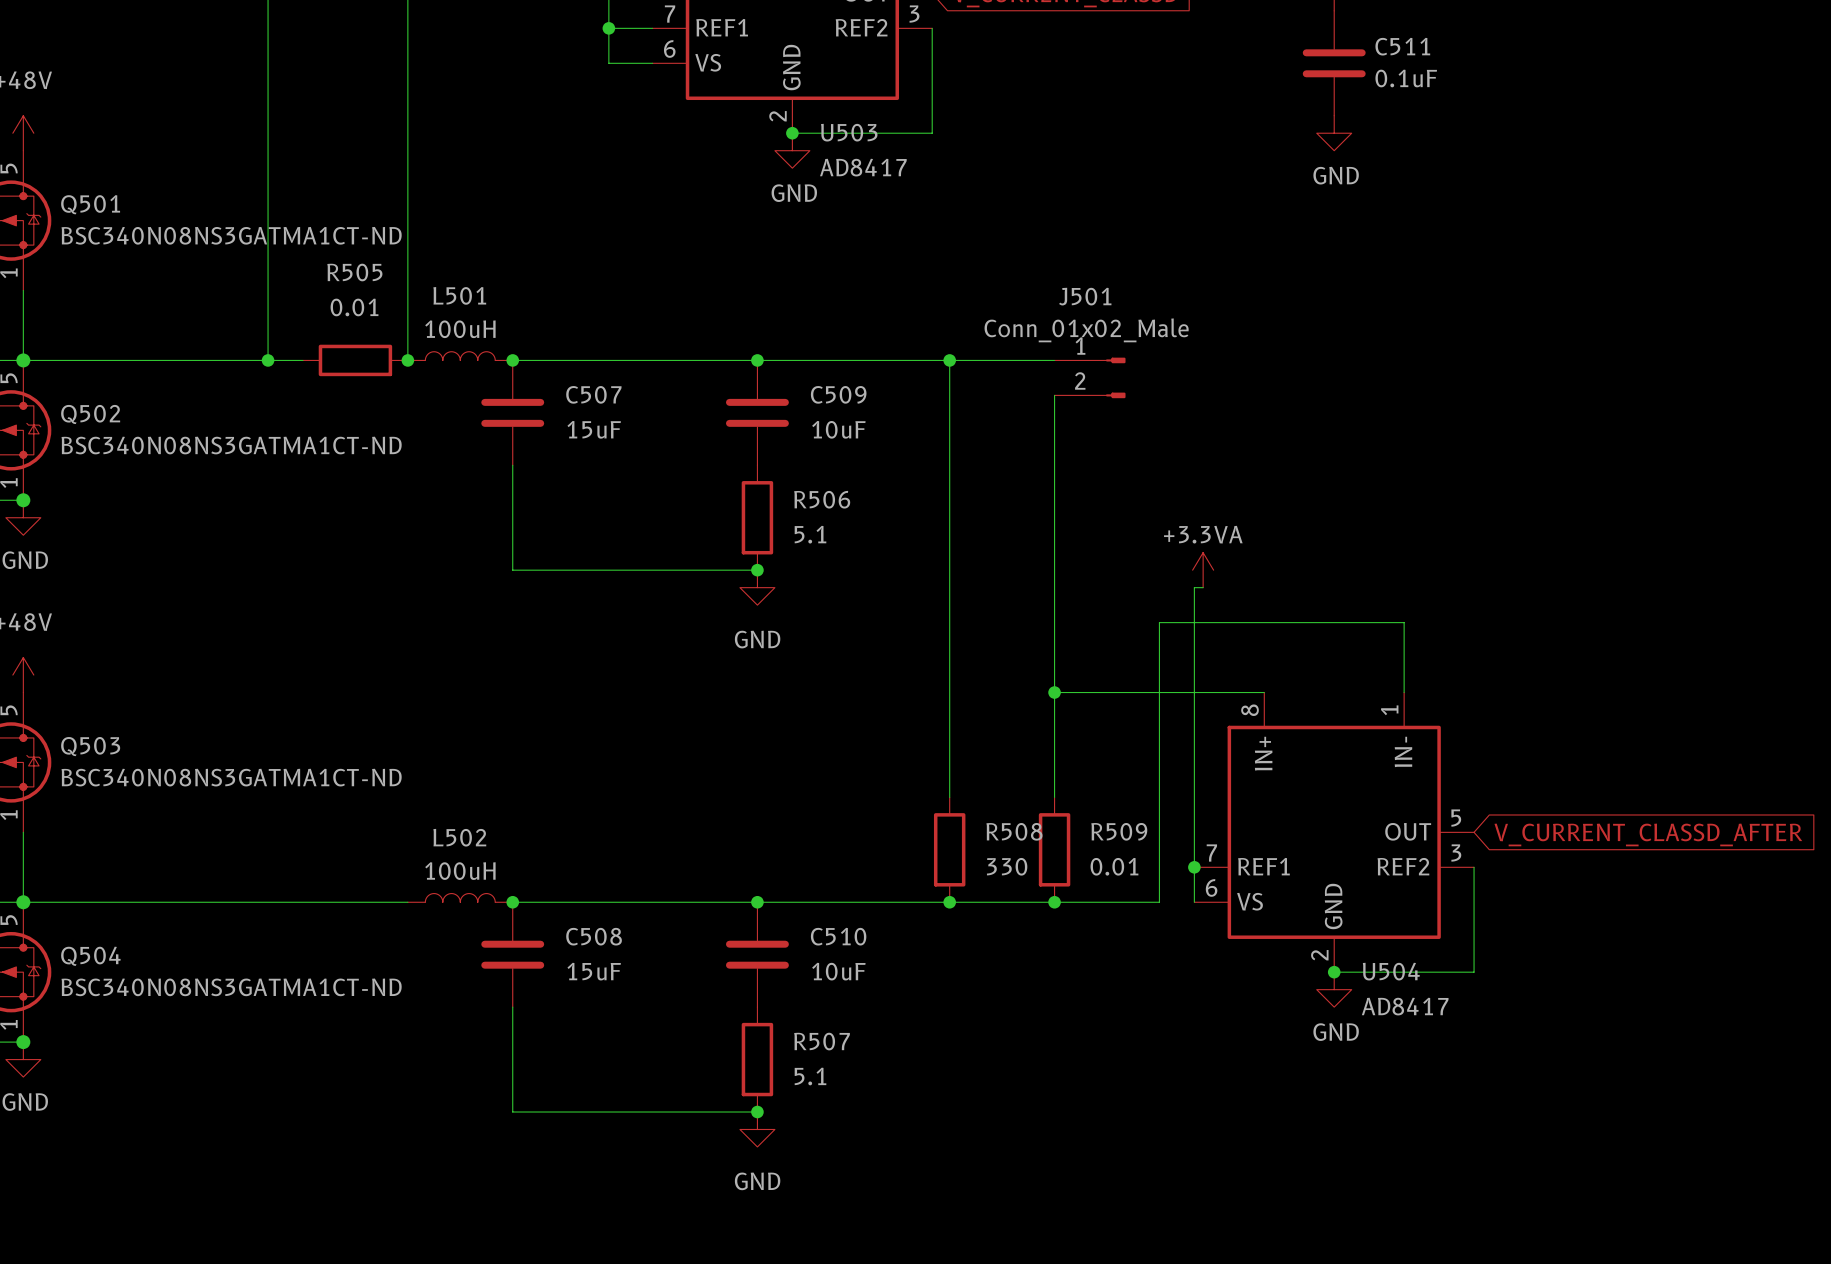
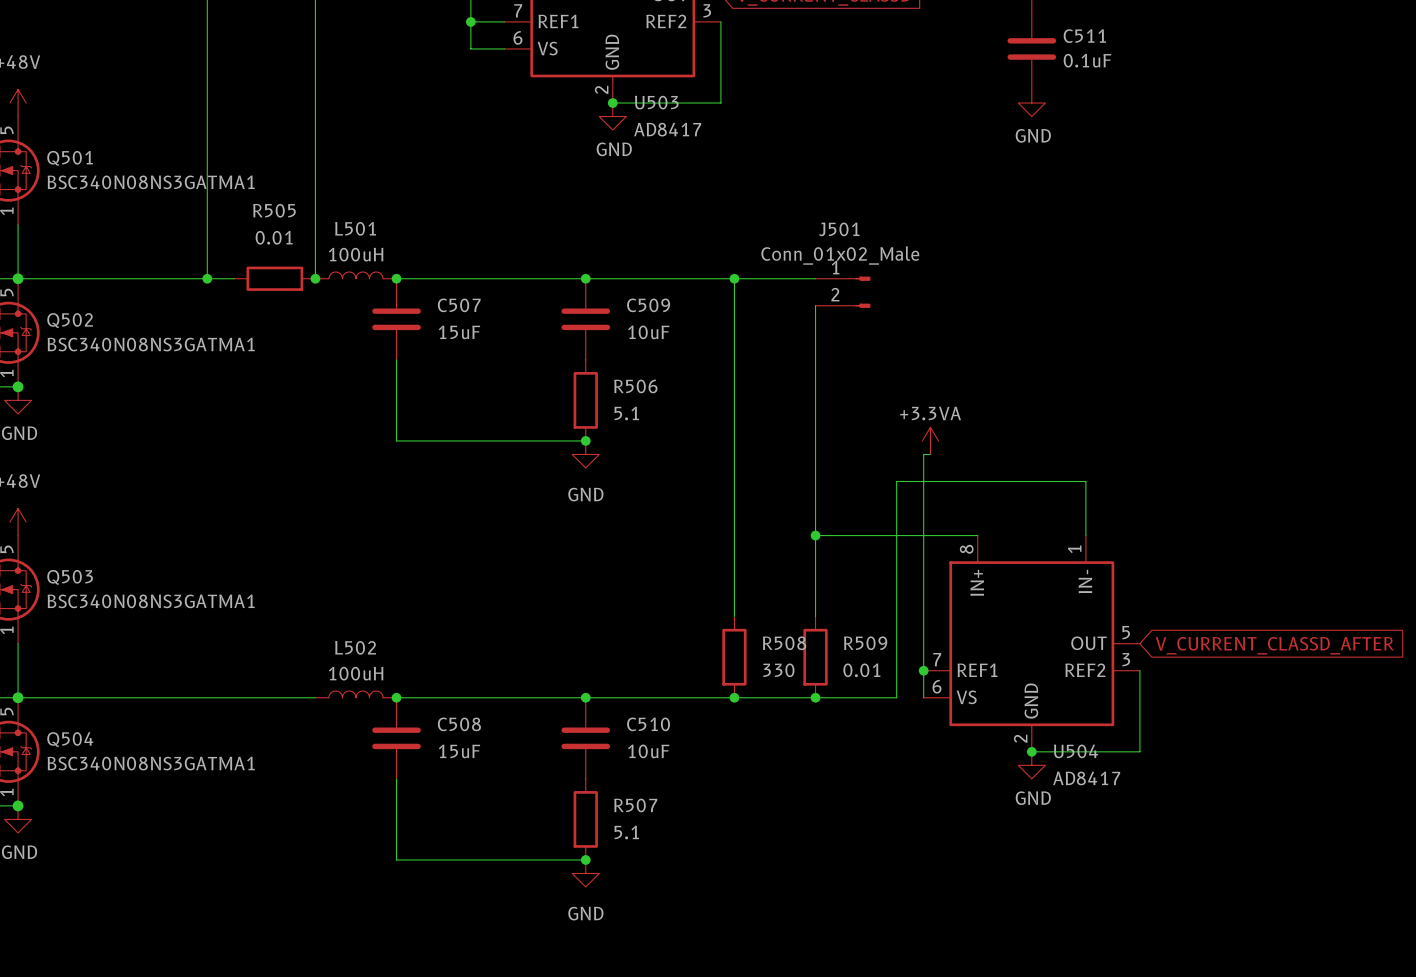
Q501 value: BSC340N08NS3GATMA1CT-ND (231, 235) -> BSC340N08NS3GATMA1 (151, 182)
Q502 value: BSC340N08NS3GATMA1CT-ND (231, 445) -> BSC340N08NS3GATMA1 (151, 344)
Q503 value: BSC340N08NS3GATMA1CT-ND (231, 777) -> BSC340N08NS3GATMA1 (151, 601)
Q504 value: BSC340N08NS3GATMA1CT-ND (231, 987) -> BSC340N08NS3GATMA1 (151, 763)

